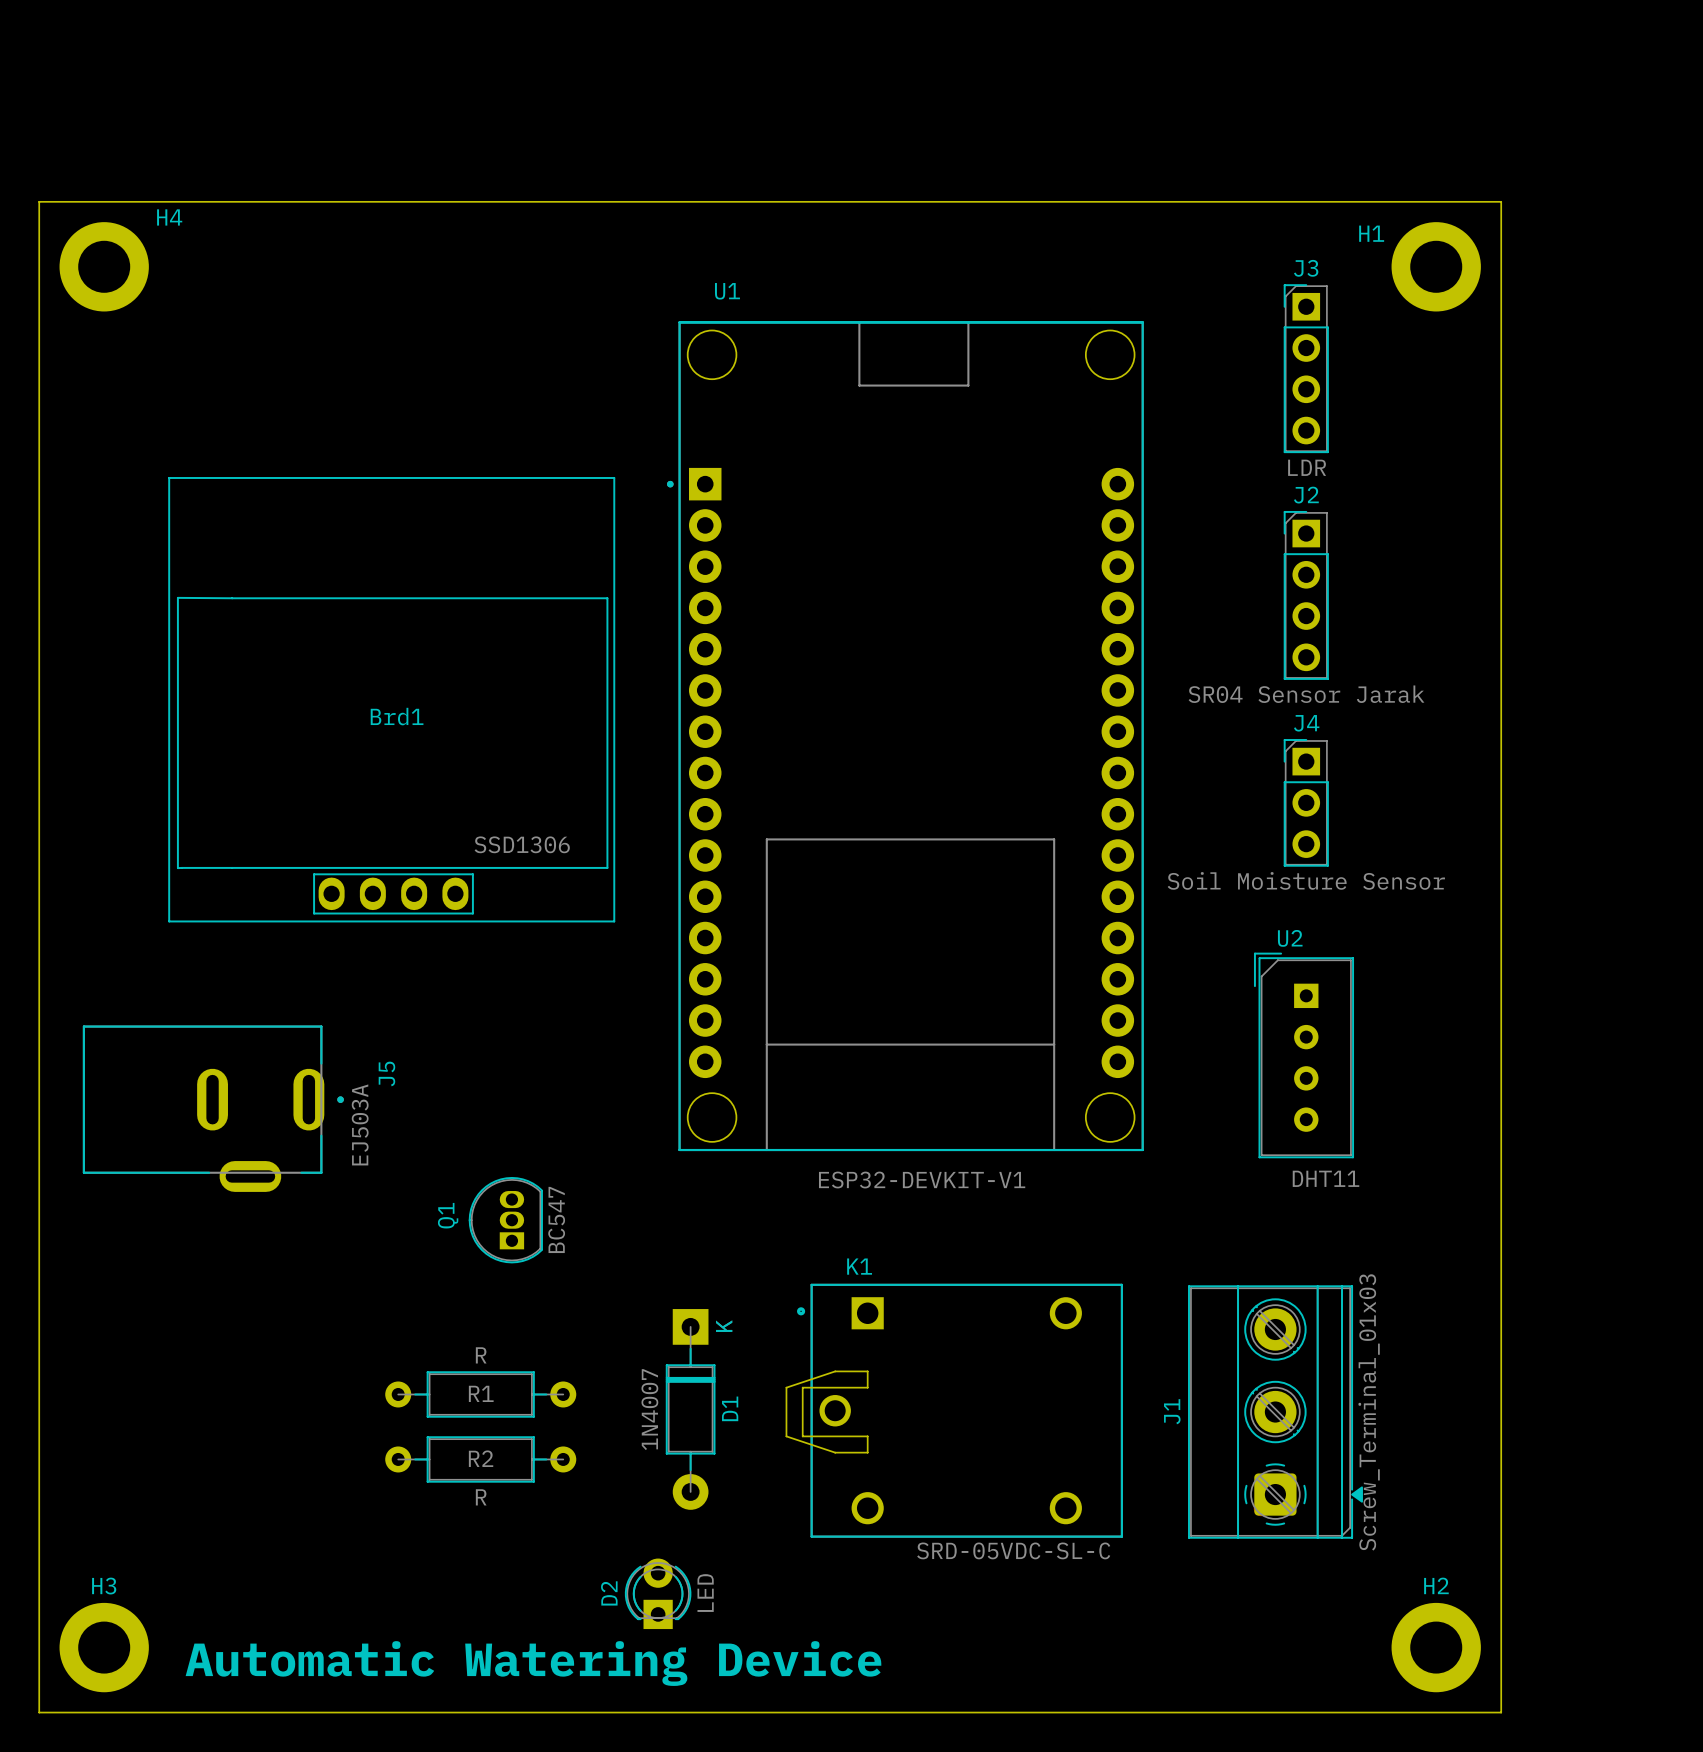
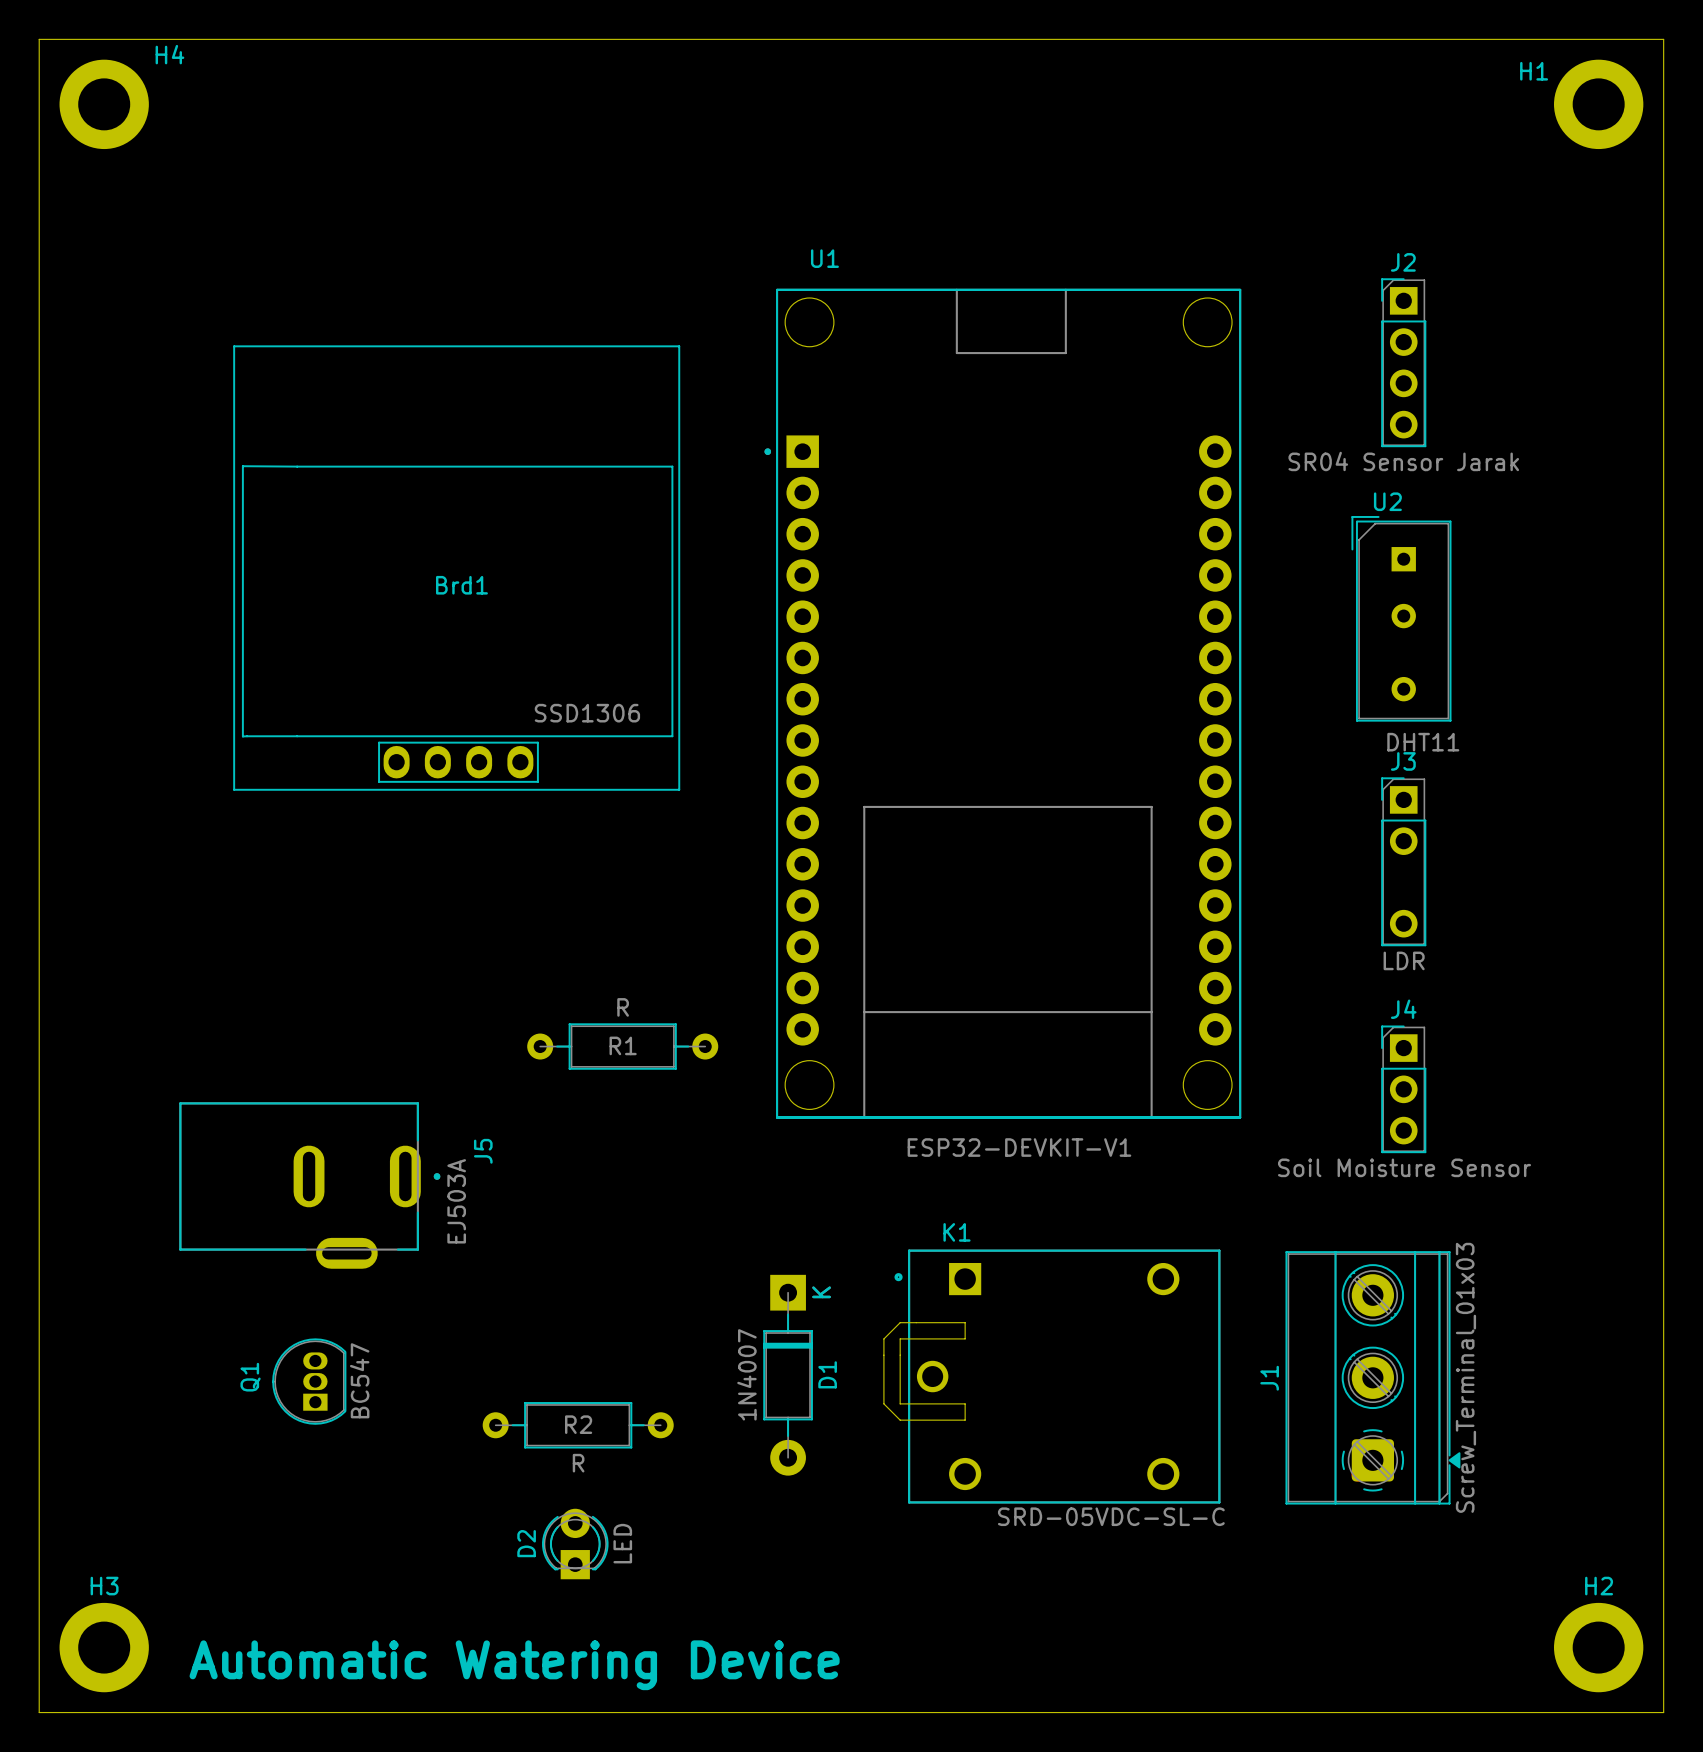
board edge: (39, 201) (1501, 201) (1501, 1712) -> (39, 201) (39, 39) (1663, 39) (1663, 1712) (1501, 1712)
H4 position: (104, 266) -> (104, 104)
H1 position: (1436, 266) -> (1598, 104)
J3 footprint: [1283, 284, 1329, 454] -> [1381, 777, 1427, 947]
J2 position: (1306, 595) -> (1403, 362)
Brd1 position: (391, 699) -> (456, 568)
U1 position: (905, 736) -> (1002, 703)
J4 position: (1306, 802) -> (1403, 1089)
U2 footprint: [1253, 952, 1355, 1159] -> [1351, 515, 1452, 722]
J5 position: (213, 1108) -> (309, 1185)
Q1 position: (505, 1220) -> (309, 1381)
board edge: none -> (900, 1322) (965, 1322) (965, 1338) (900, 1338) (900, 1403) (965, 1403) (965, 1420) (900, 1420) (883, 1403) (883, 1338) (900, 1322)
board edge: (835, 1371) (867, 1371) (867, 1387) (802, 1387) (802, 1436) (867, 1436) (867, 1452) (835, 1452) (786, 1436) (786, 1387) (835, 1371) -> none
R1 position: (480, 1394) -> (622, 1046)
D1 position: (690, 1409) -> (788, 1375)
K1 position: (959, 1410) -> (1057, 1376)
J1 position: (1275, 1412) -> (1372, 1377)
R2 position: (480, 1459) -> (578, 1425)
D2 position: (658, 1593) -> (575, 1544)
H2 position: (1436, 1647) -> (1598, 1647)

